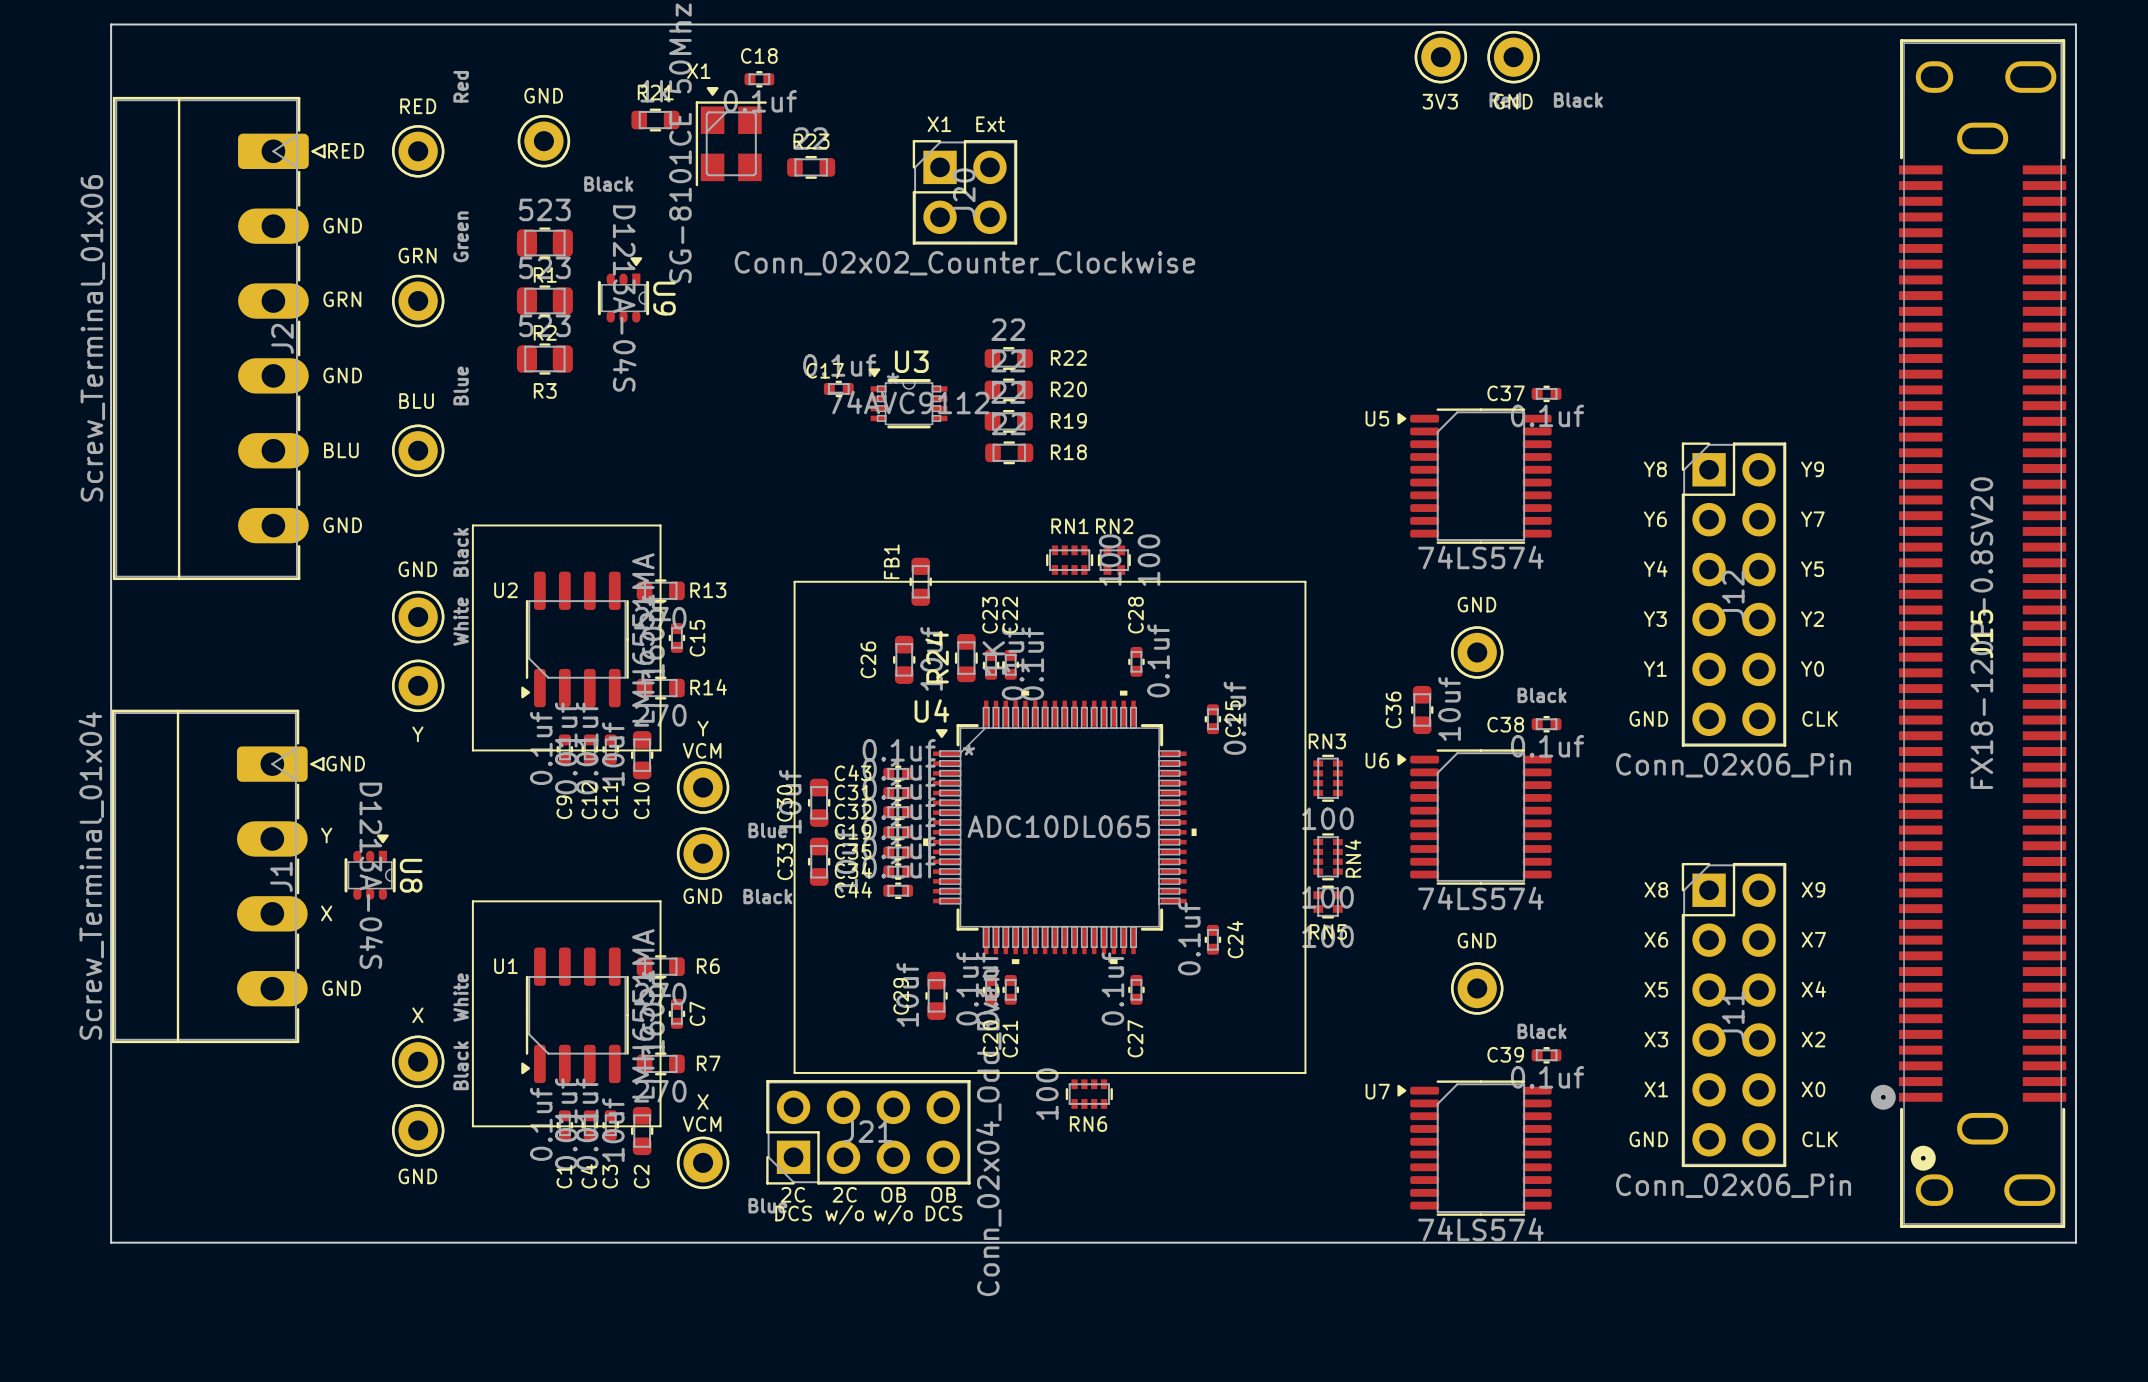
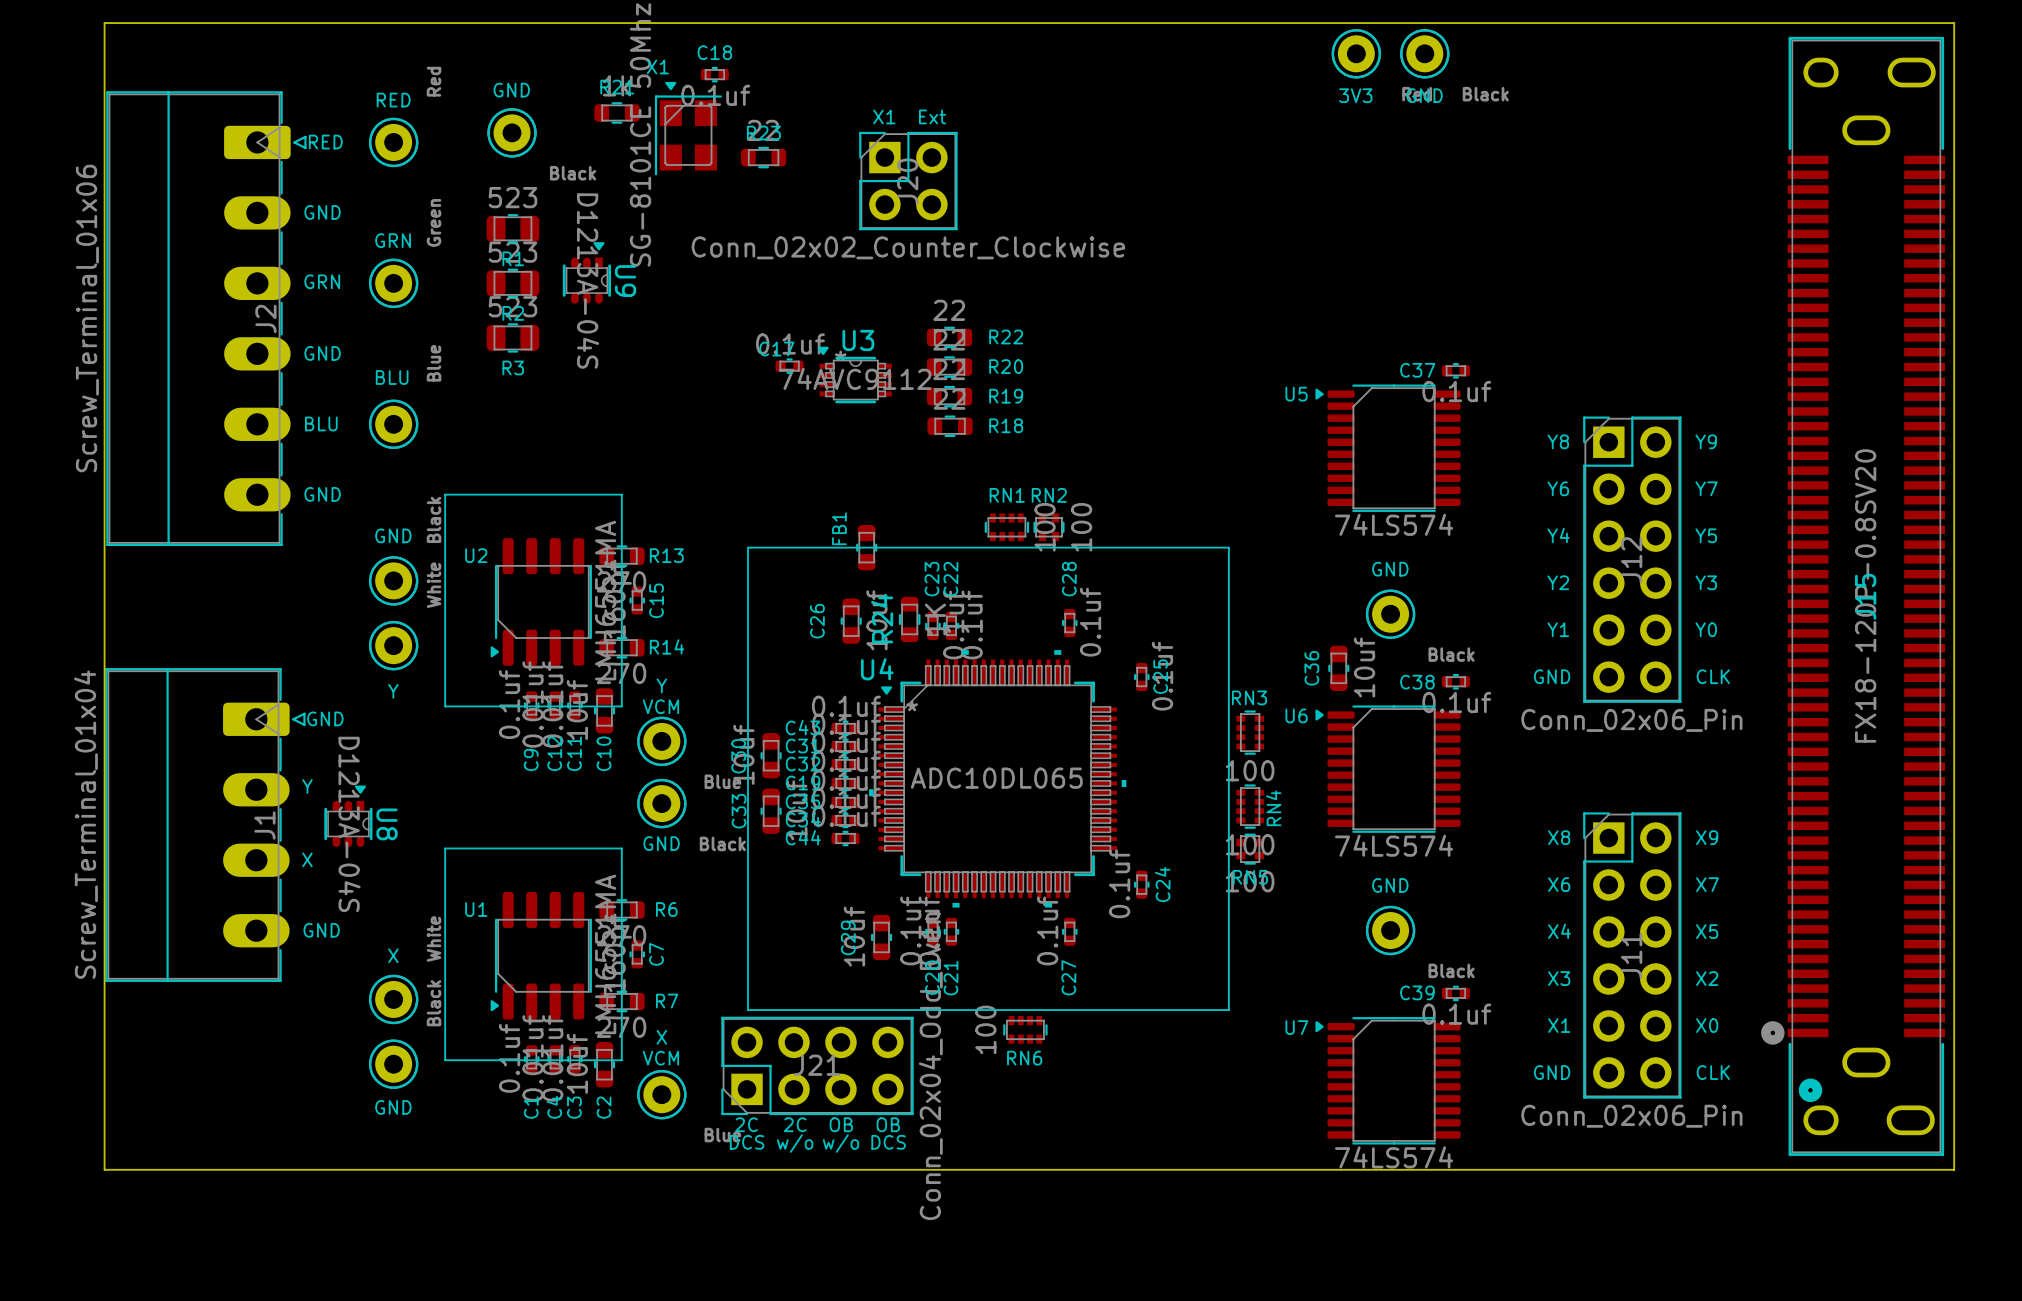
text: Y3 (1655, 619) -> Y2 (1558, 582)
text: Y2 (1812, 619) -> Y3 (1706, 582)
text: X5 (1656, 989) -> X4 (1559, 931)
text: X4 (1813, 989) -> X5 (1707, 931)

